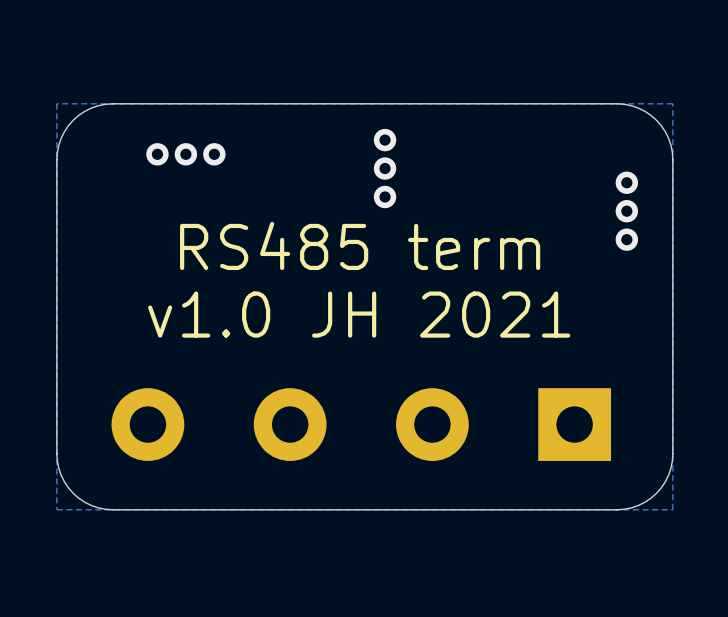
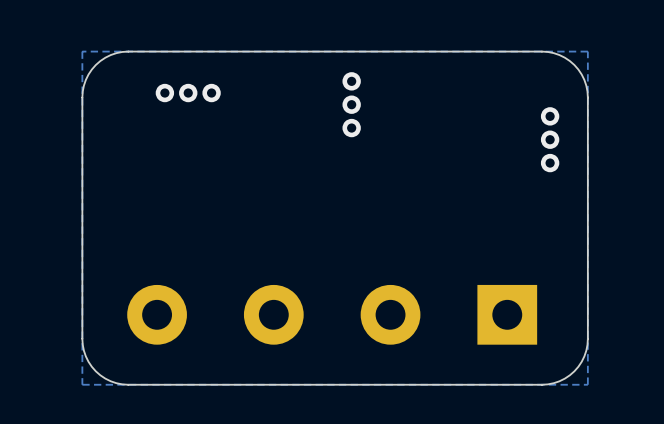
text: RS485 term (360, 245) -> none
text: v1.0 JH 2021 (359, 314) -> none

